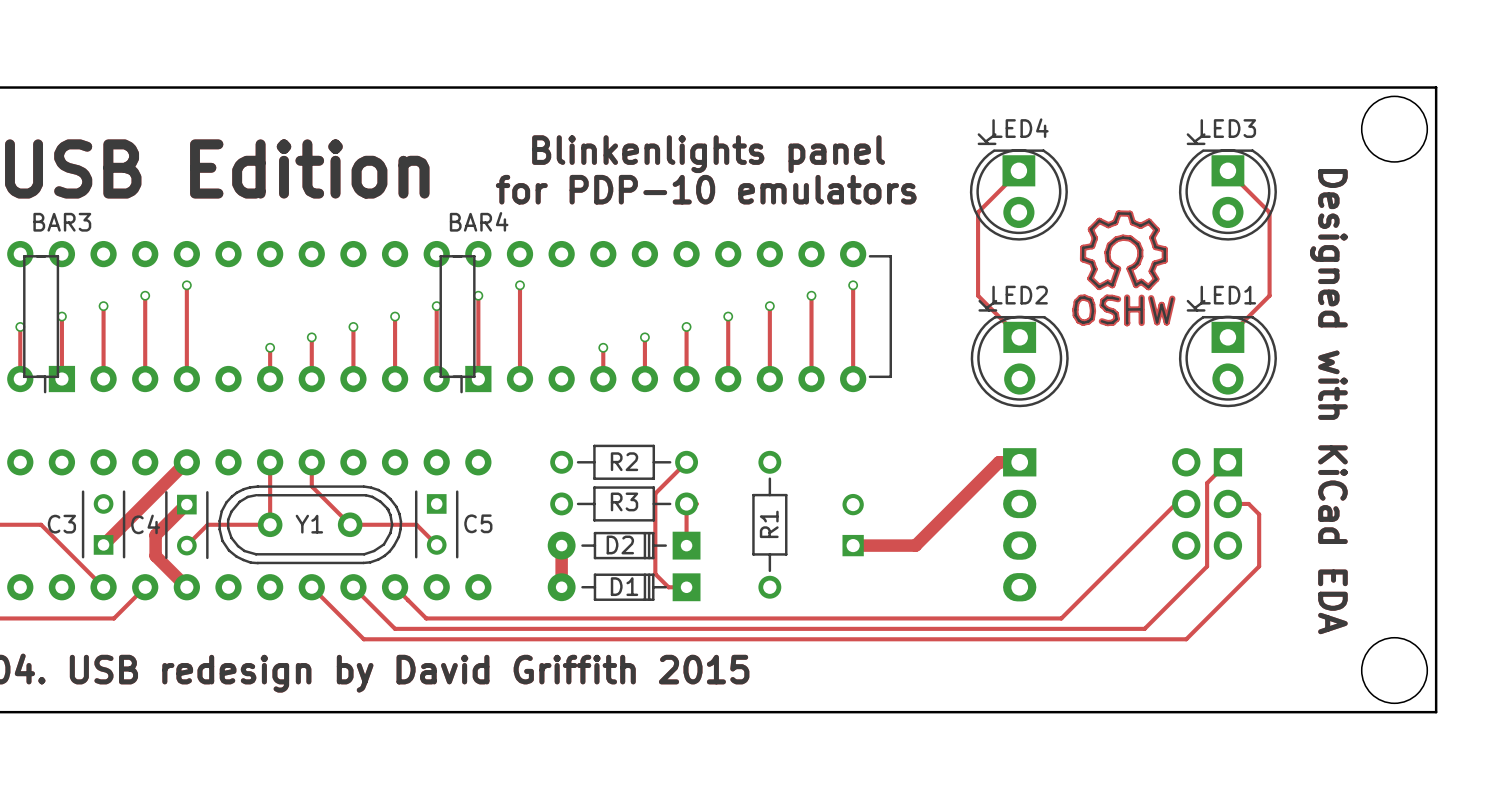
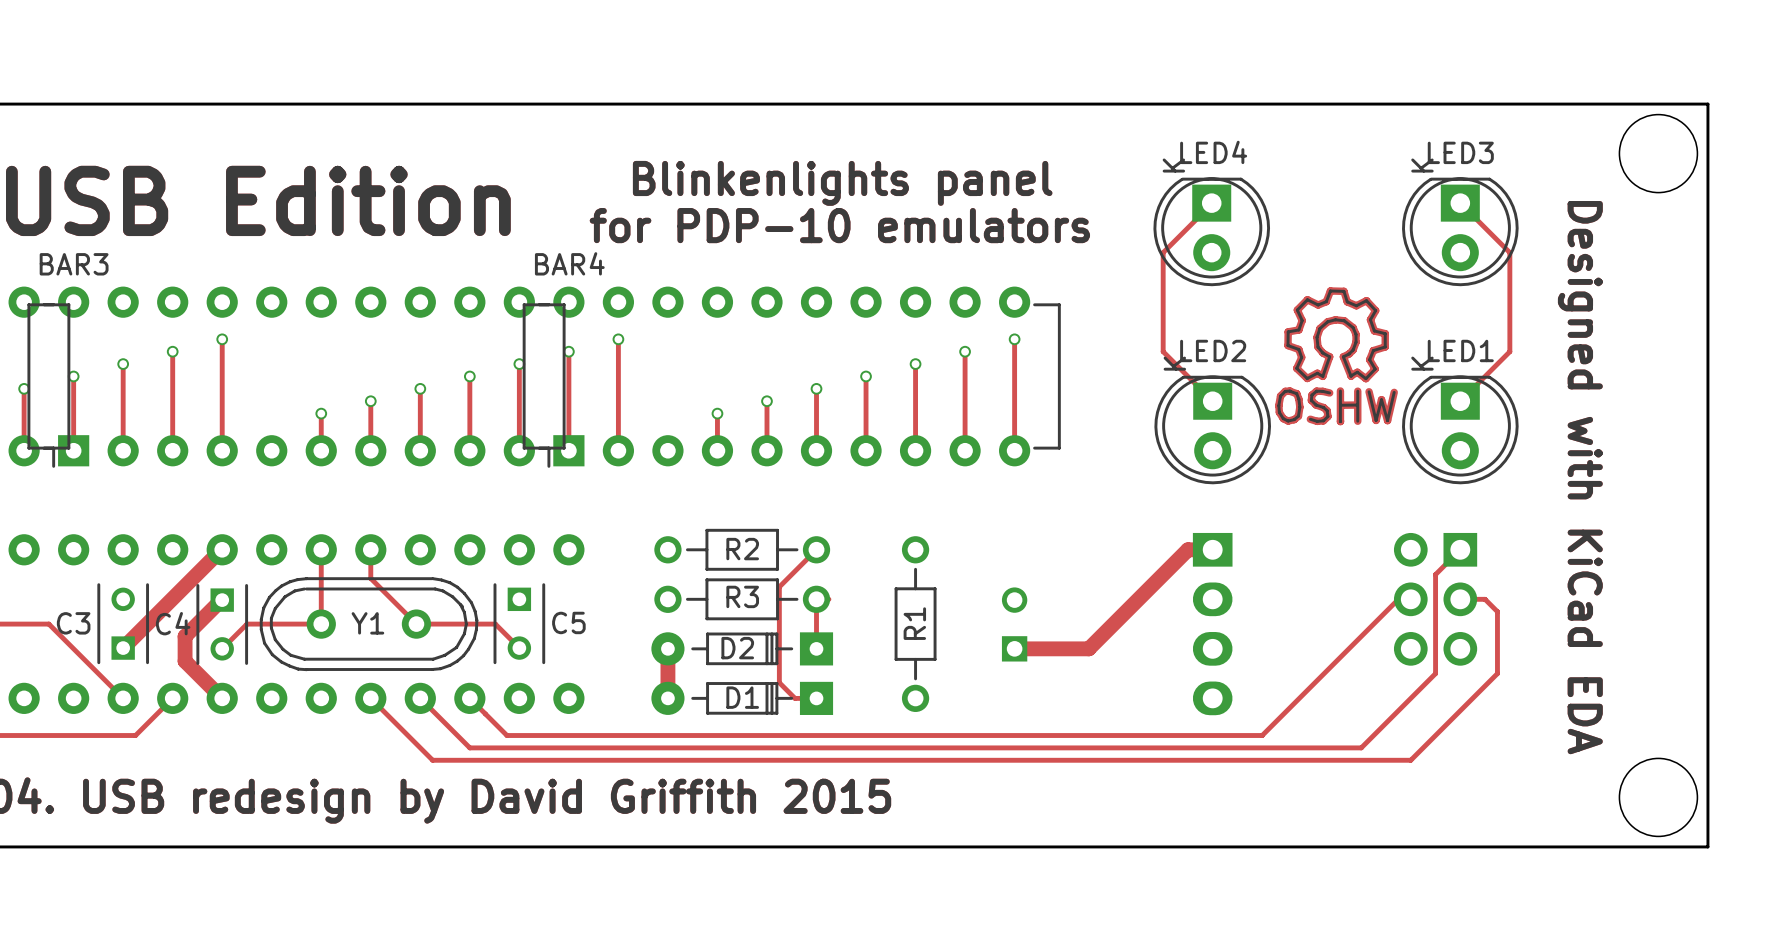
drawing position: (1123, 268) -> (1336, 356)
drawing position: (1123, 268) -> (1336, 356)

